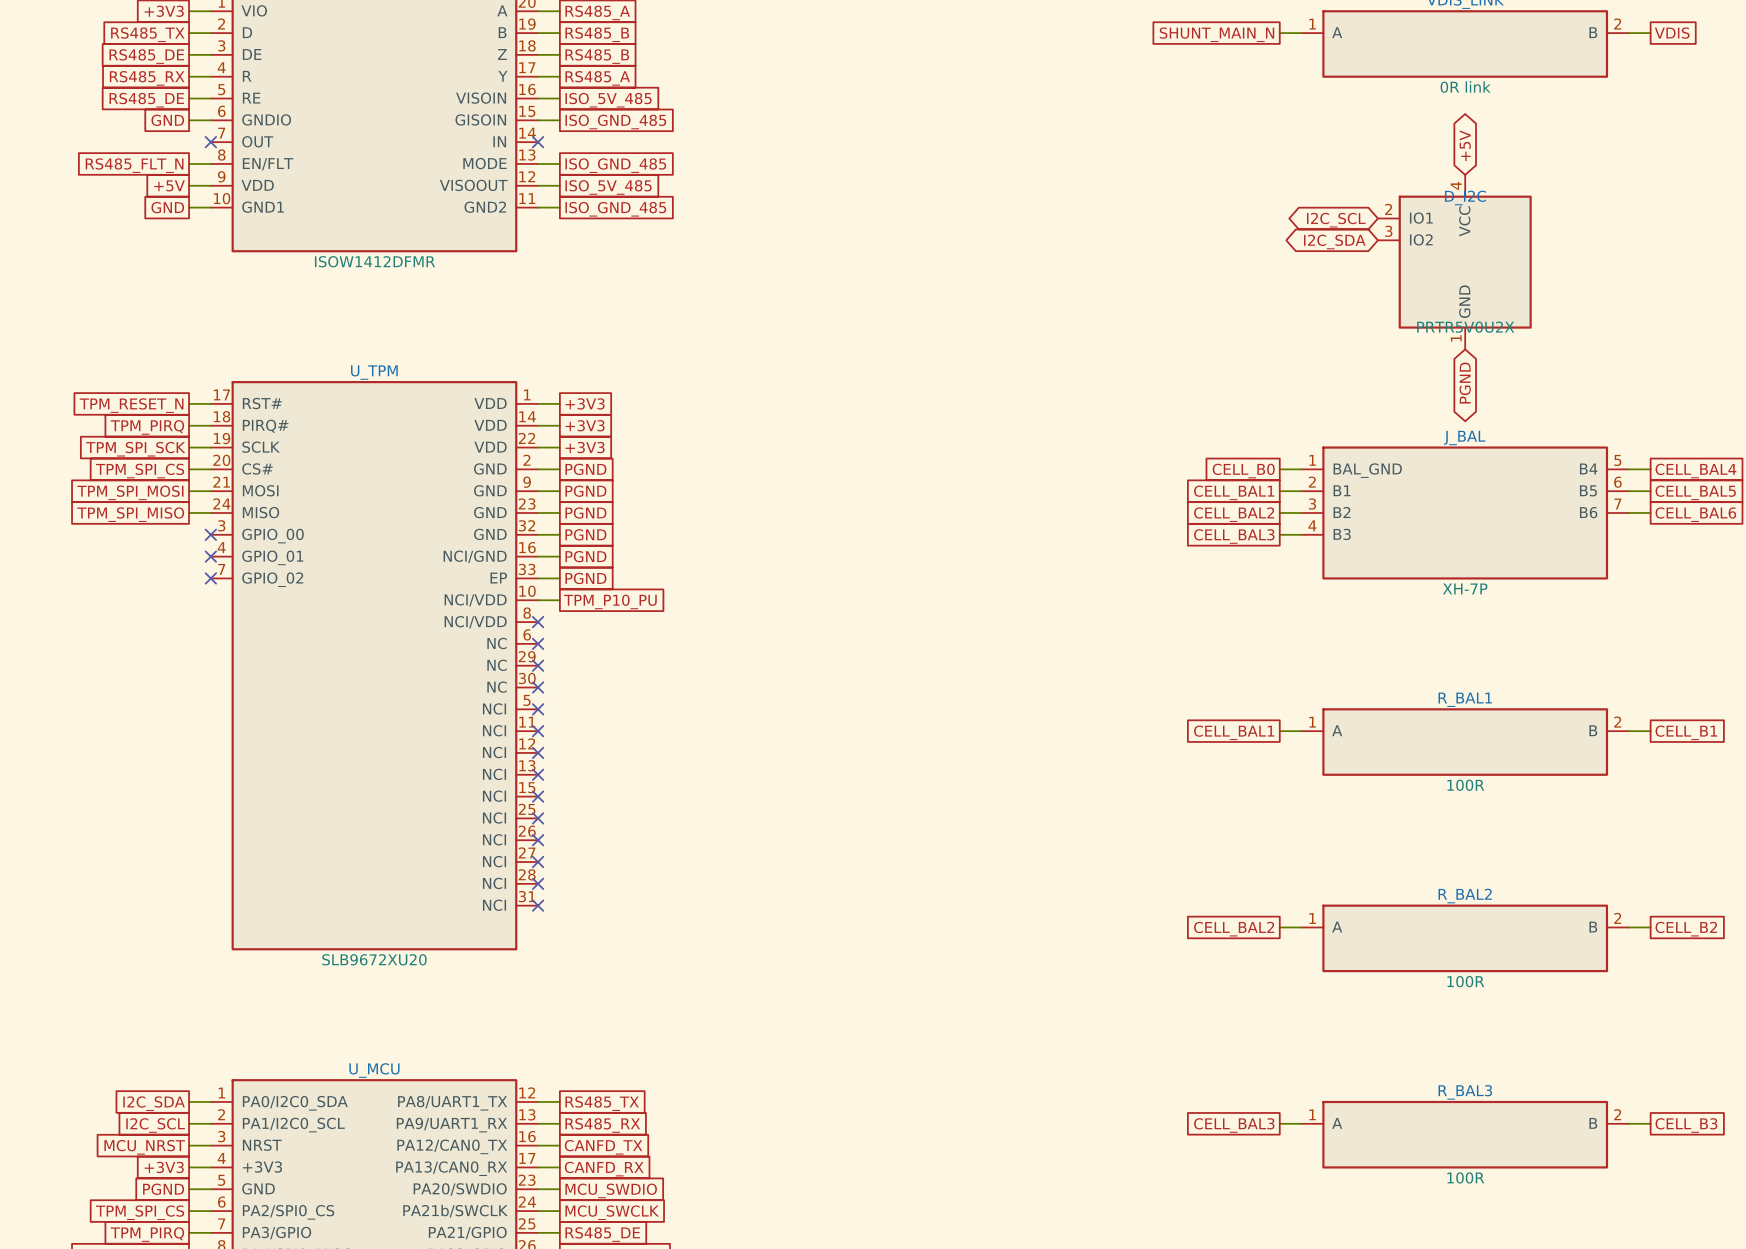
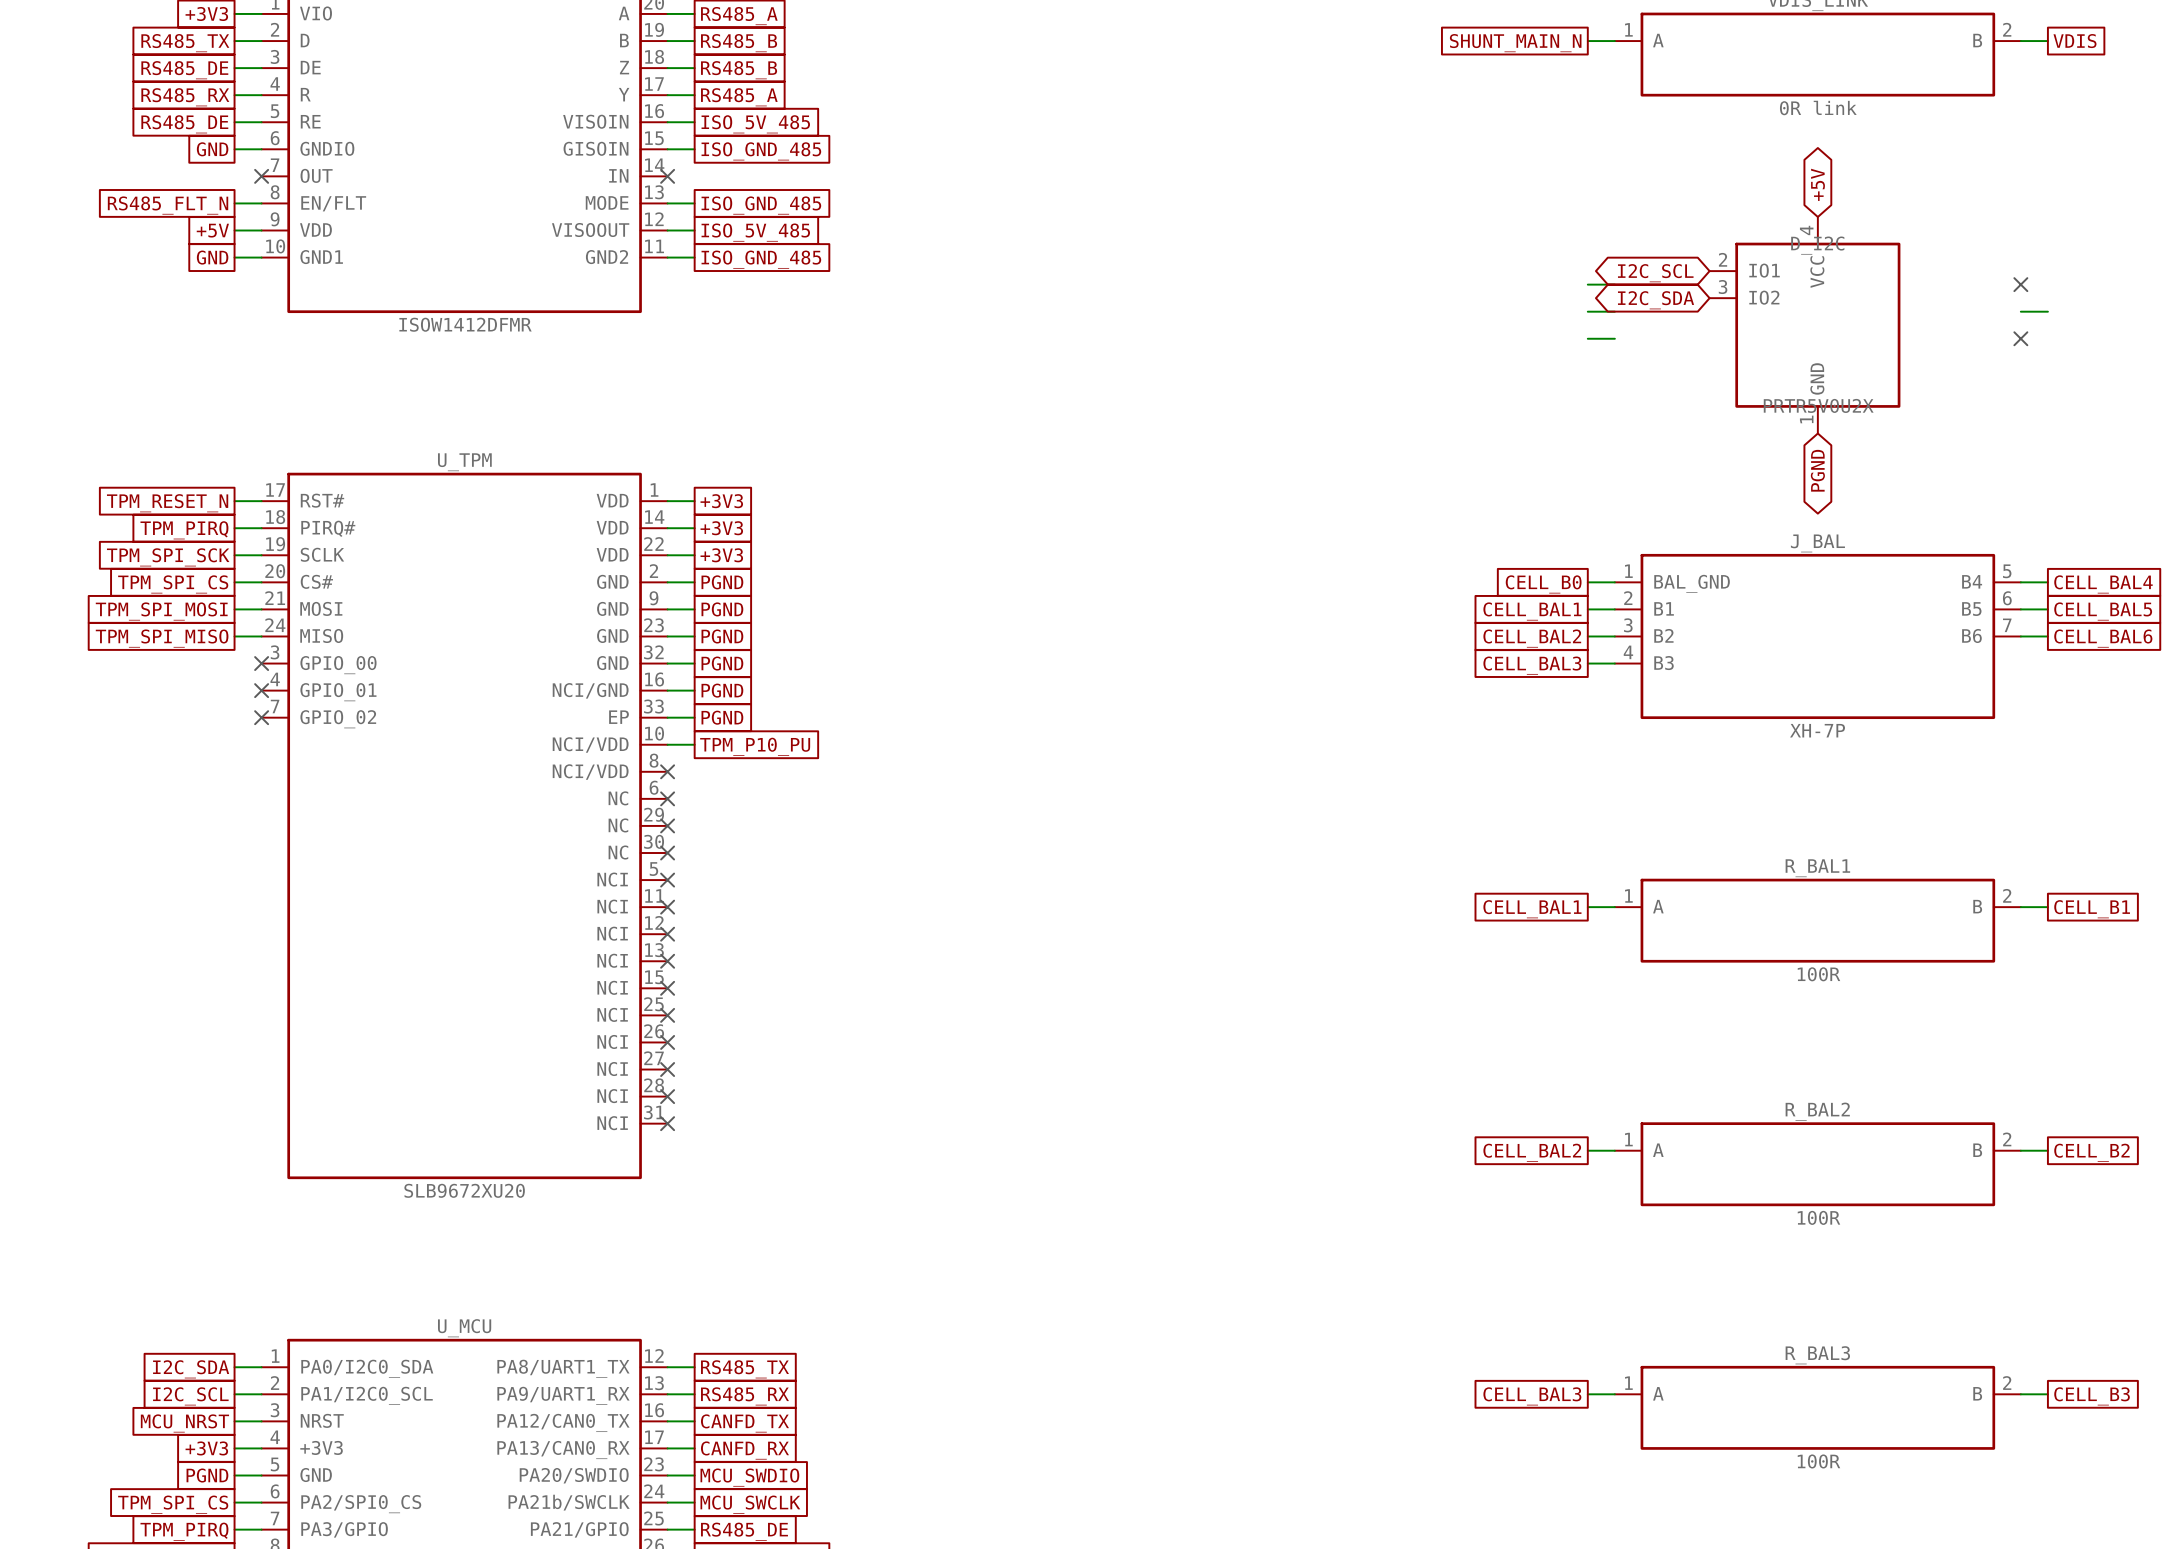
wire: none -> (1587, 284) (1614, 284)
no-connect mark: none -> (2020, 284)
wire: none -> (1587, 311) (1614, 311)
wire: none -> (2020, 311) (2047, 311)
wire: none -> (1587, 338) (1614, 338)
no-connect mark: none -> (2020, 338)

